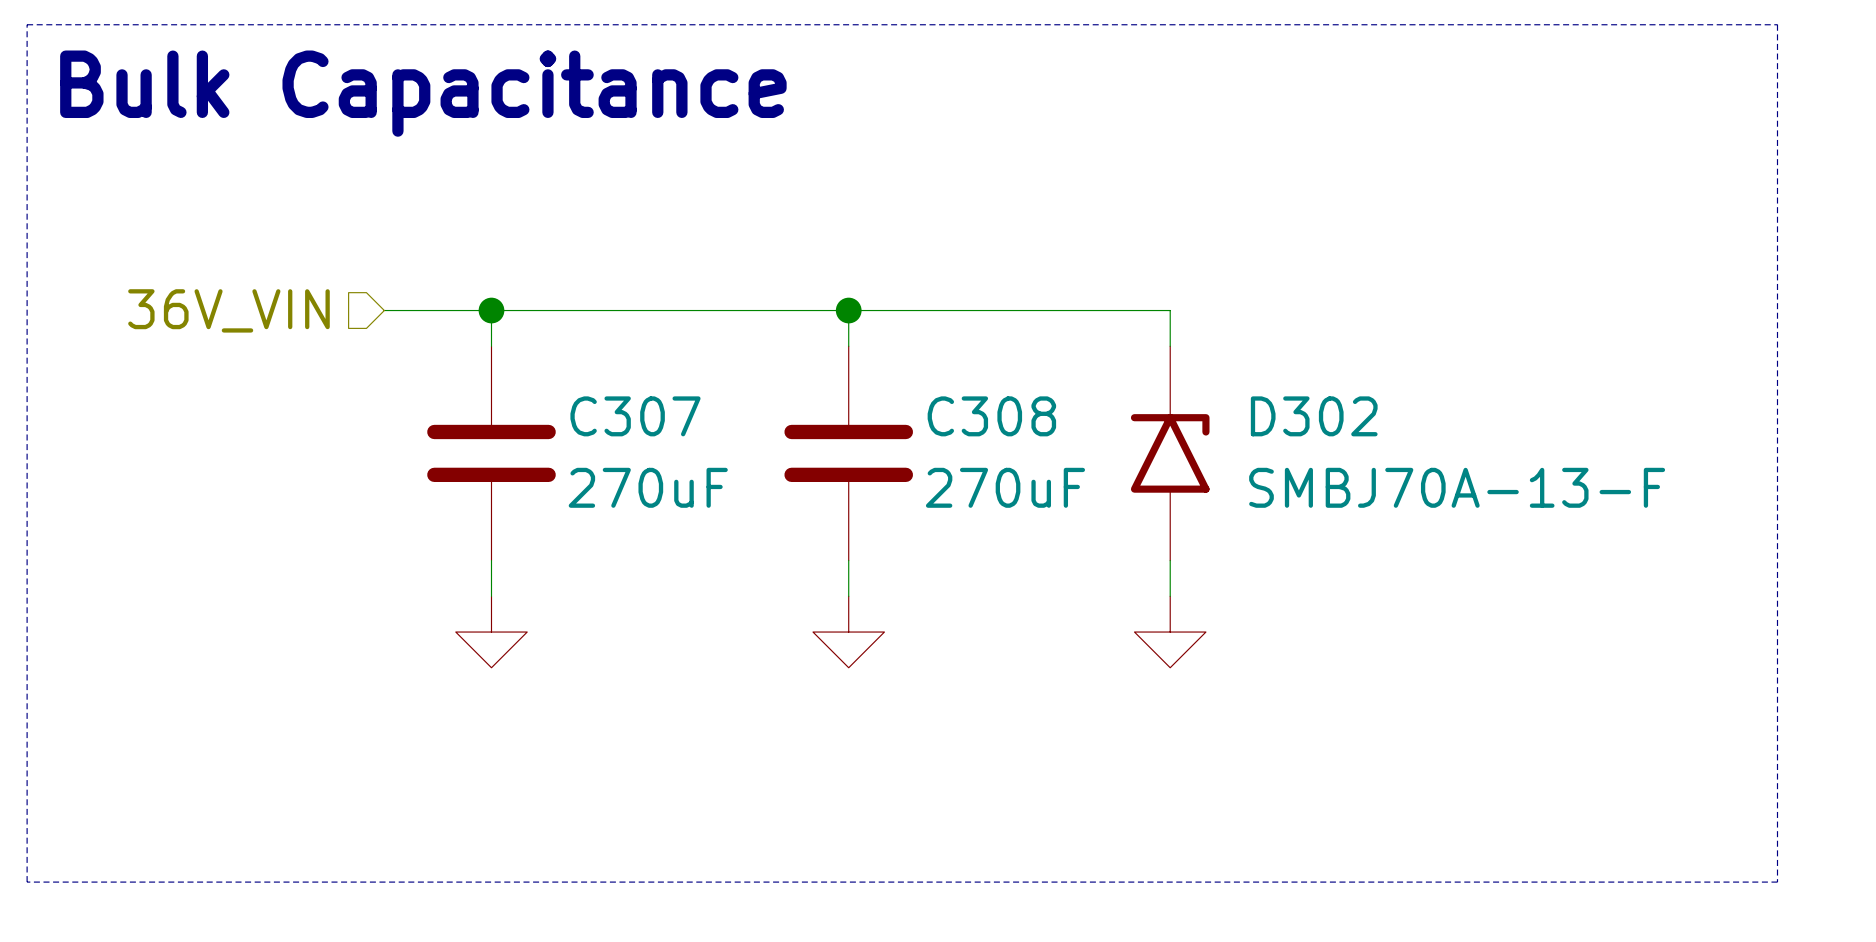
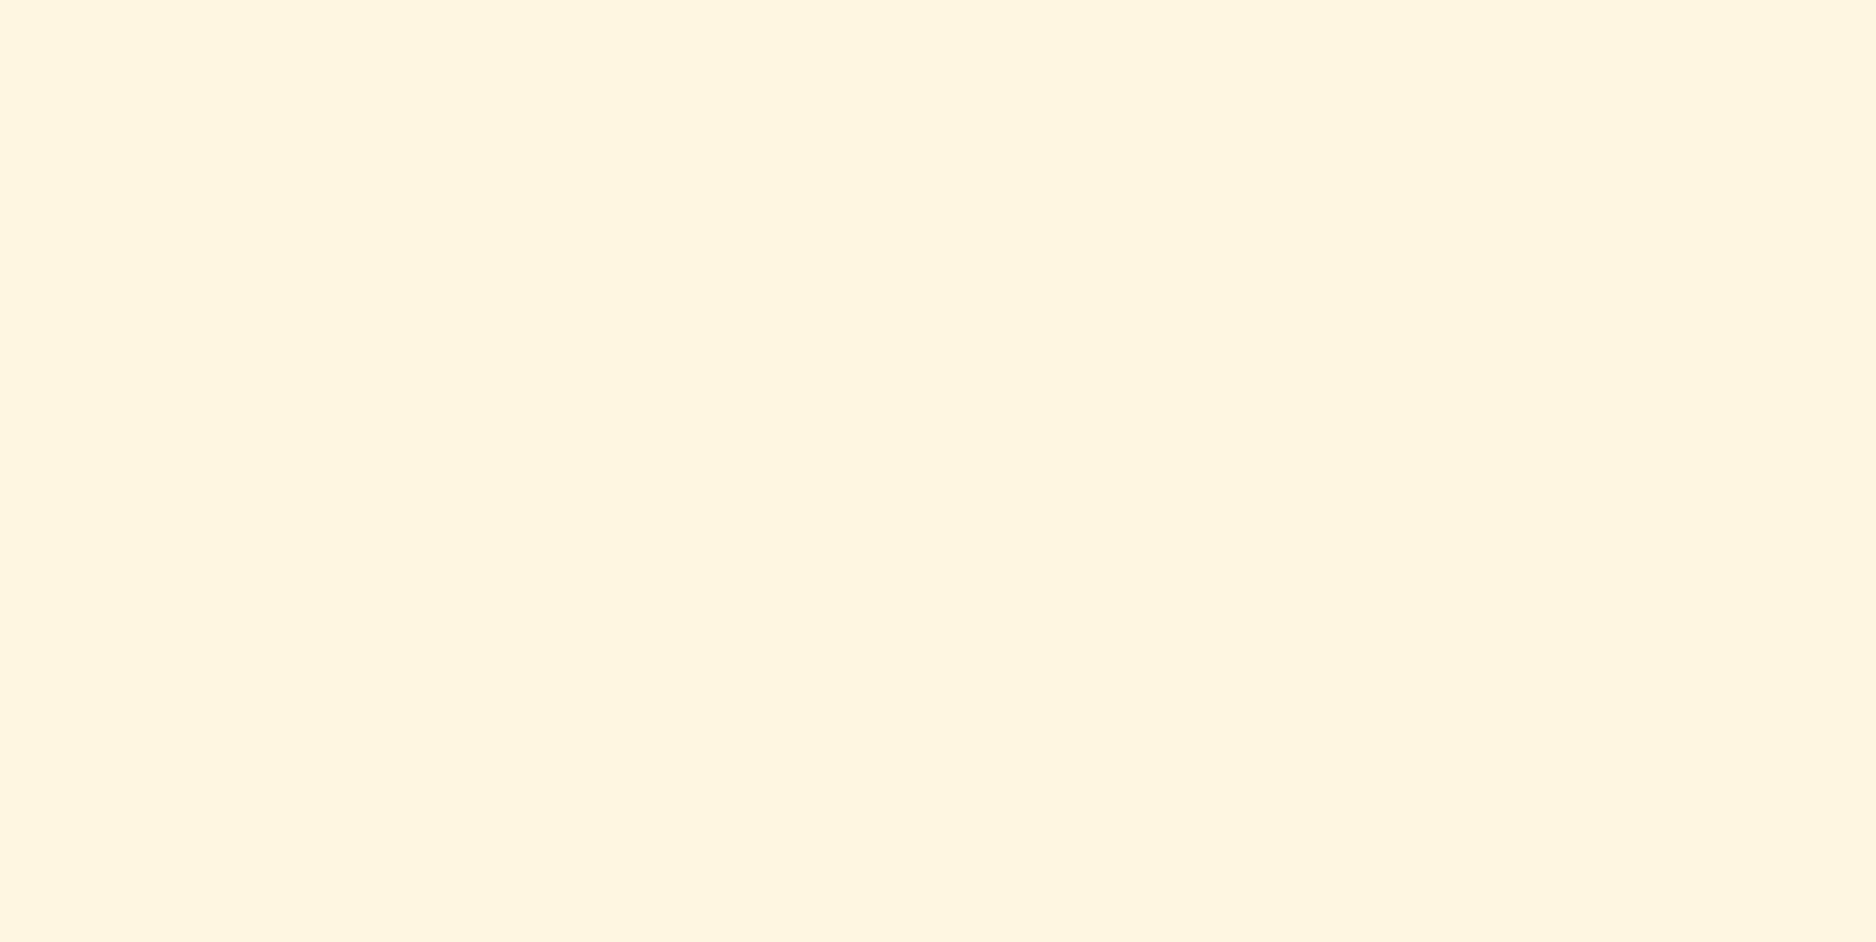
line: (27, 24) (1777, 24) (1777, 882) (27, 882) (27, 24) -> none
text: Bulk Capacitance (423, 93) -> none
hierarchical label: 36V_VIN (228, 310) -> none
wire: (384, 310) (1170, 310) (1170, 346) -> none
wire: (491, 310) (491, 346) -> none
junction: (491, 310) -> none
wire: (848, 310) (848, 346) -> none
junction: (848, 310) -> none
C307: 270uF (491, 453) -> none
C308: 270uF (848, 453) -> none
D302: SMBJ70A-13-F (1170, 453) -> none
wire: (491, 560) (491, 596) -> none
wire: (848, 560) (848, 596) -> none
wire: (1170, 560) (1170, 596) -> none
power symbol: (491, 632) -> none
power symbol: (848, 632) -> none
power symbol: (1170, 632) -> none

